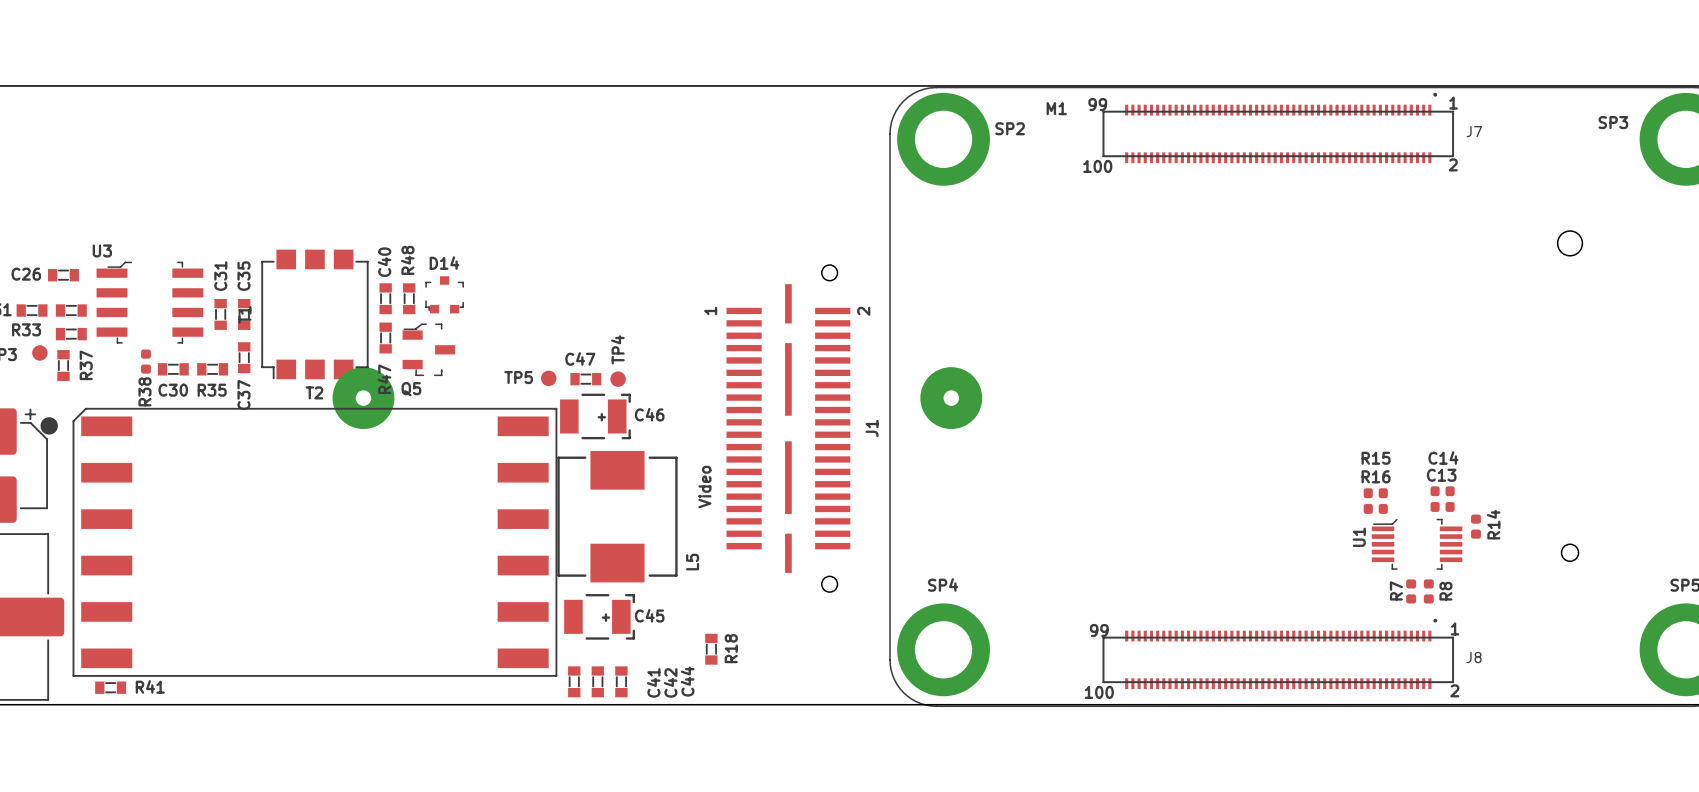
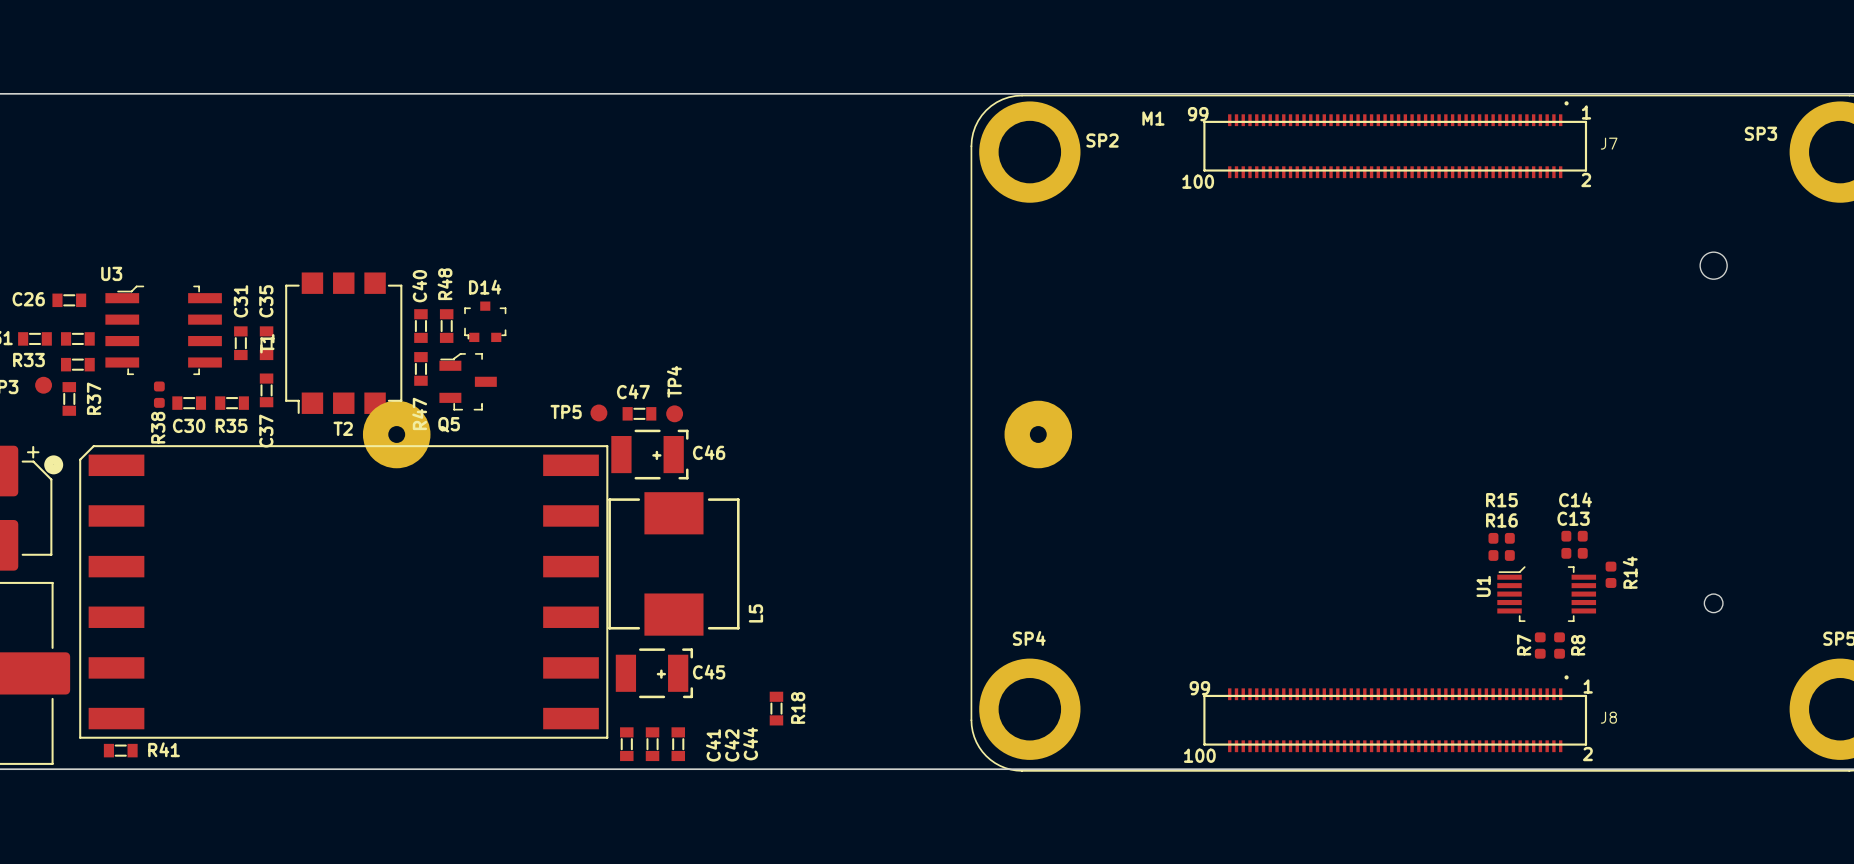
J1: (788, 428) -> none
text: Video (704, 487) -> none

